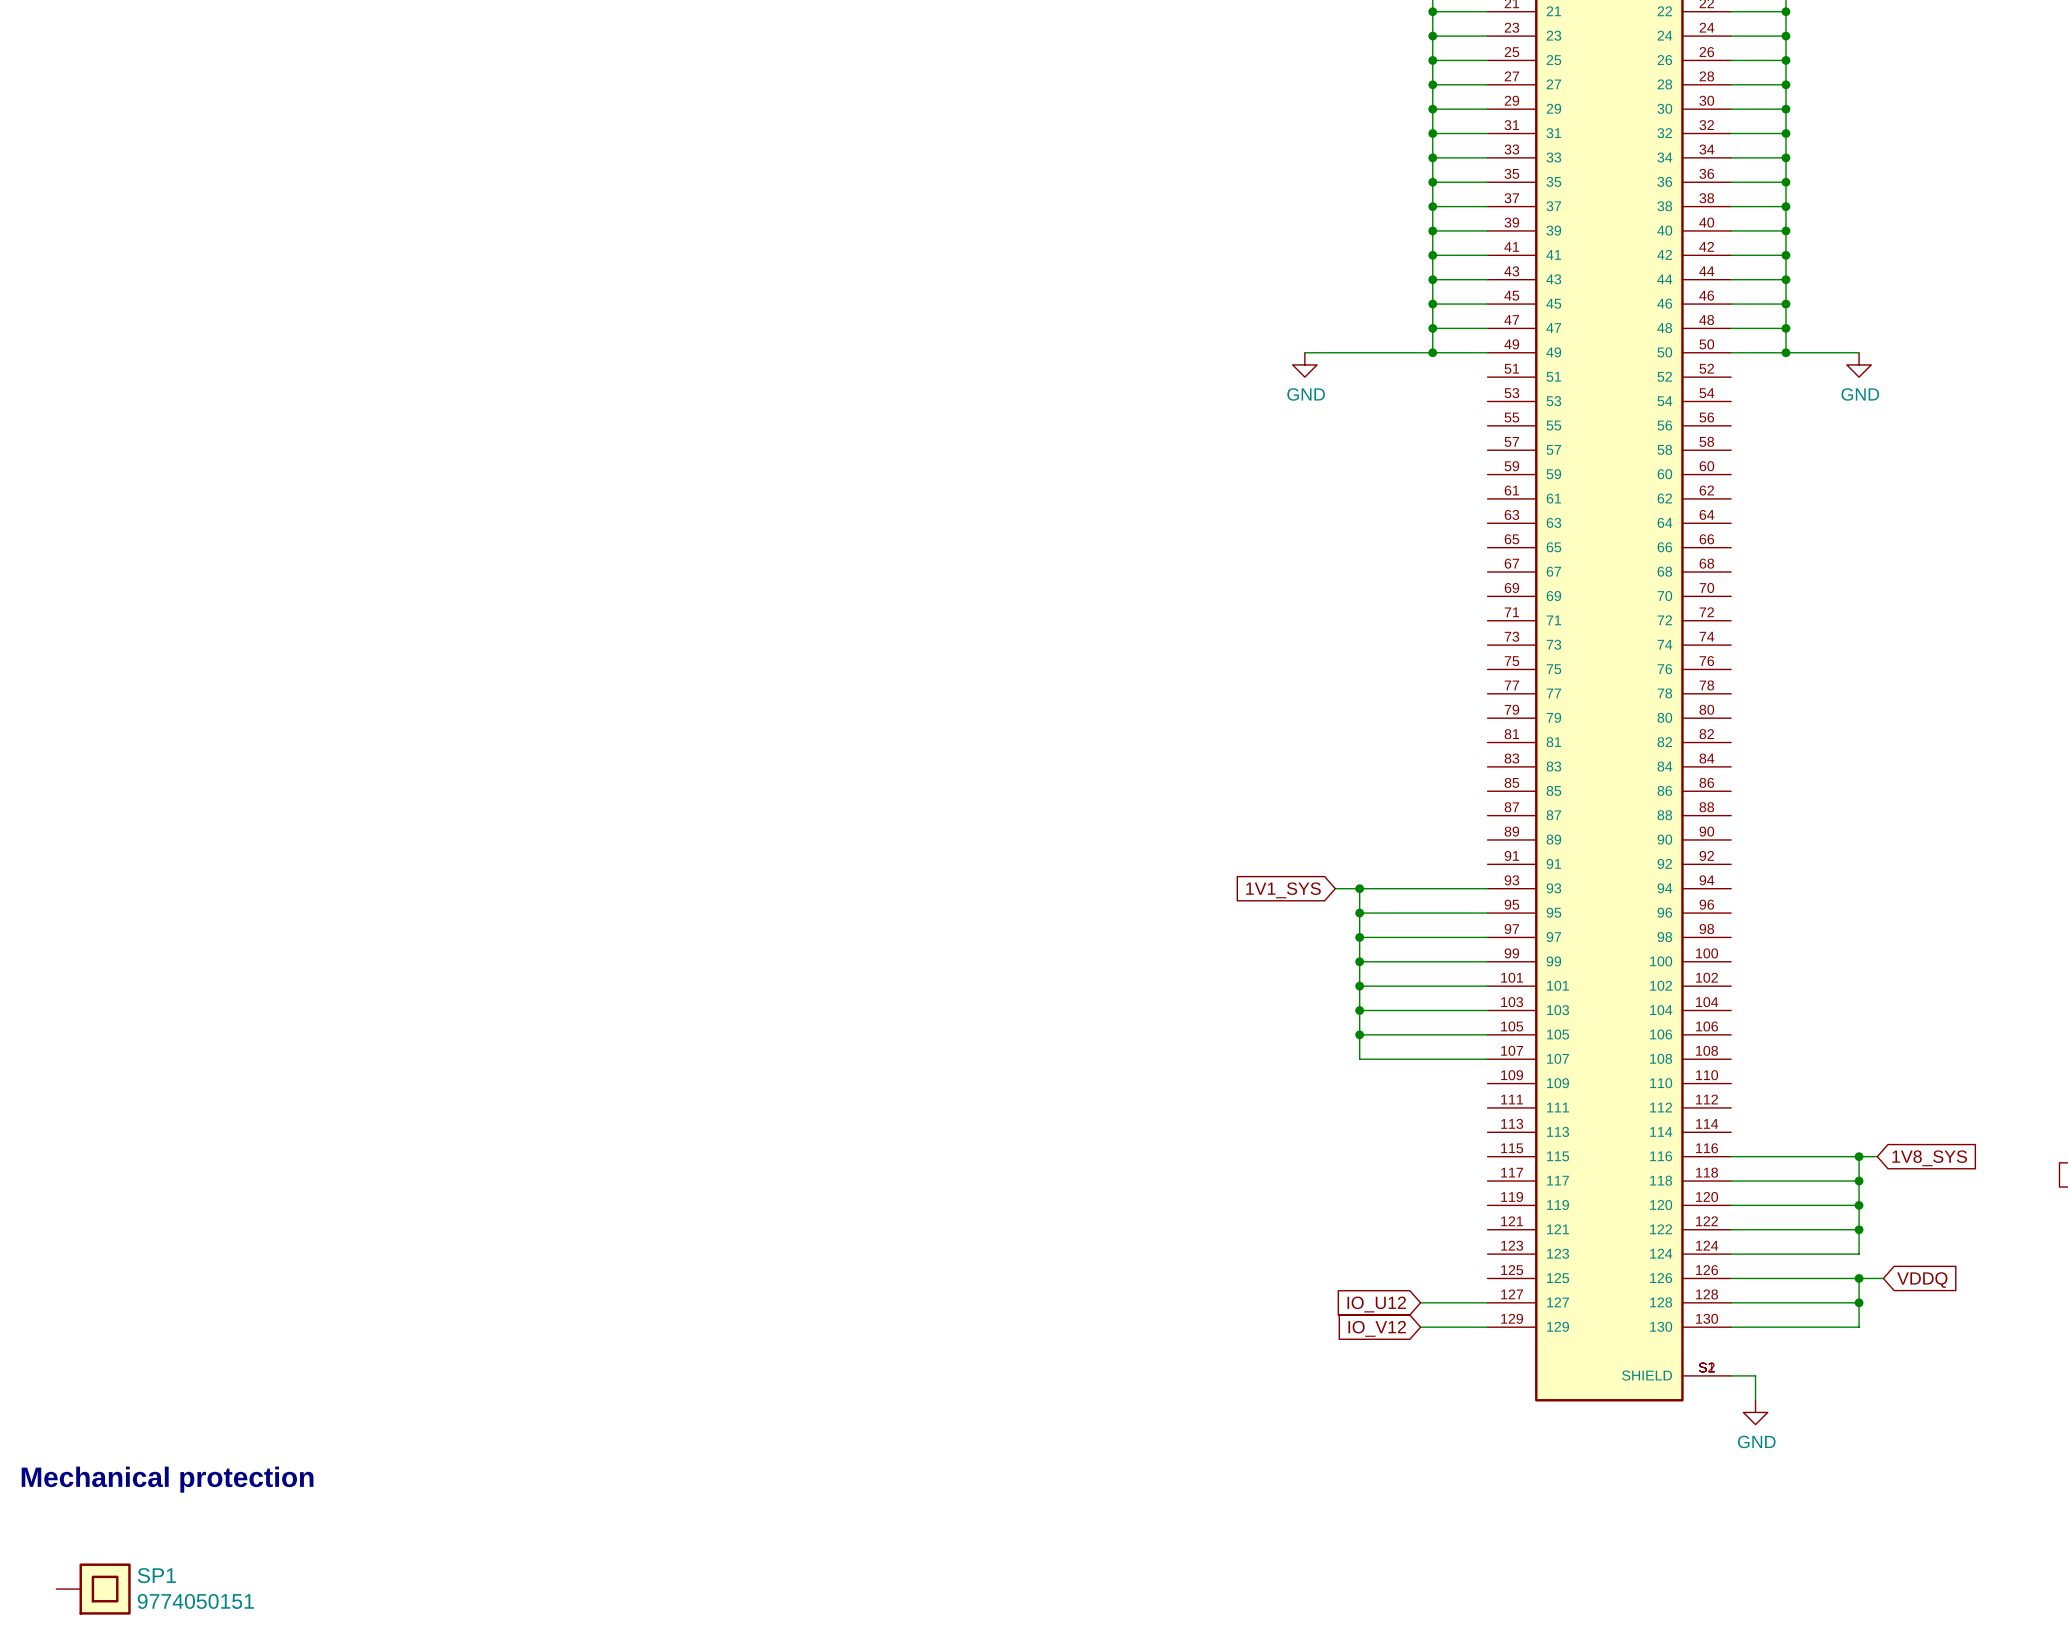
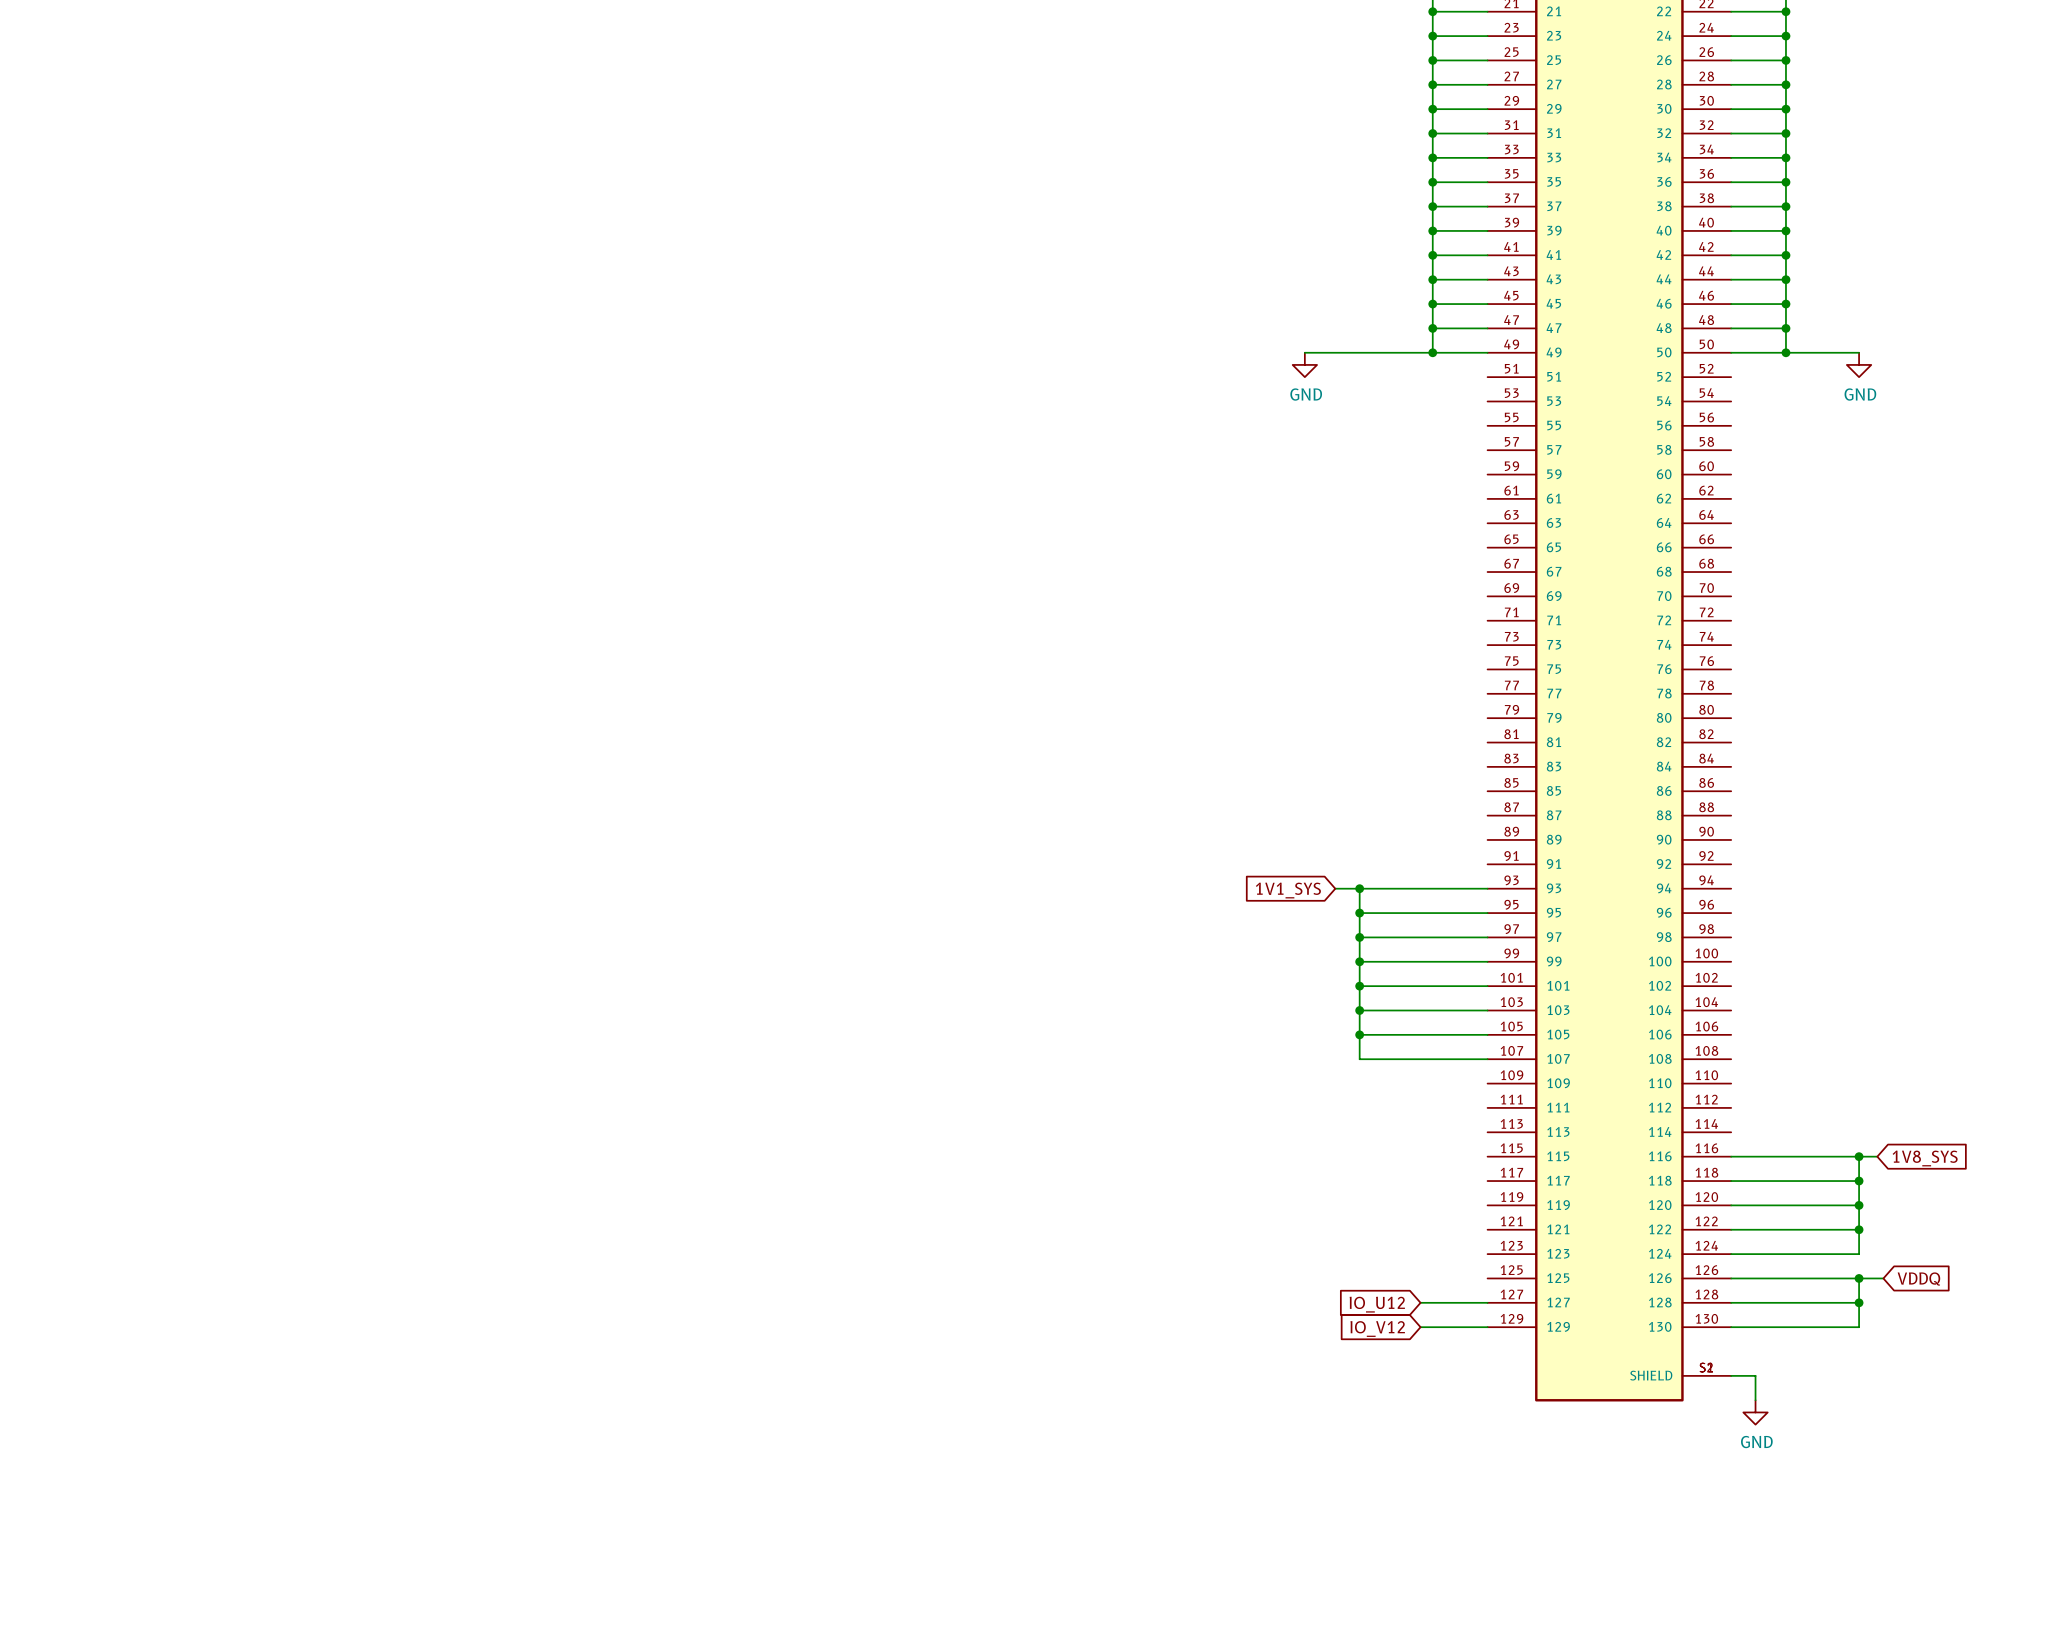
text: Mechanical protection (167, 1479) -> none
SP1: 9774050151 (93, 1589) -> none

